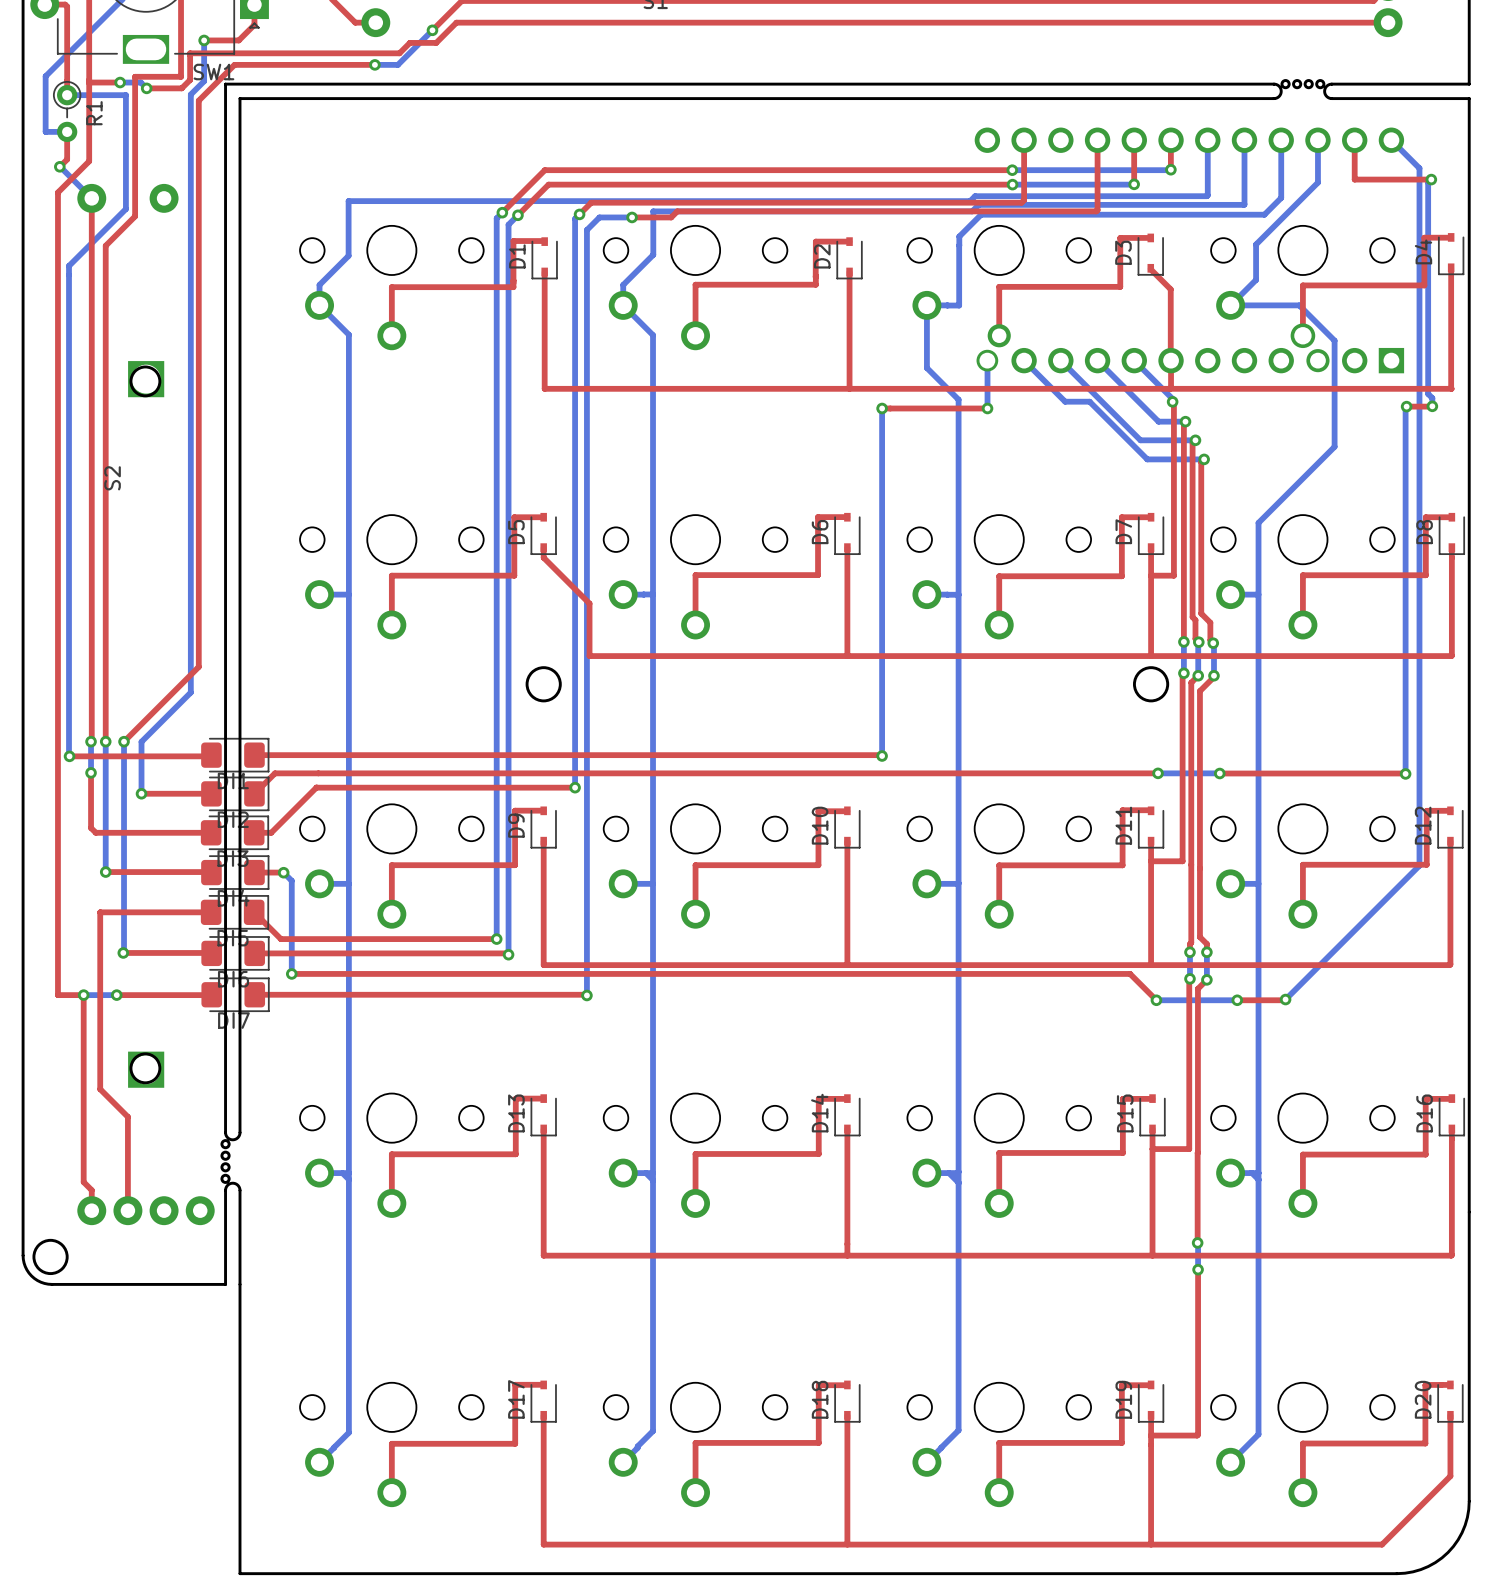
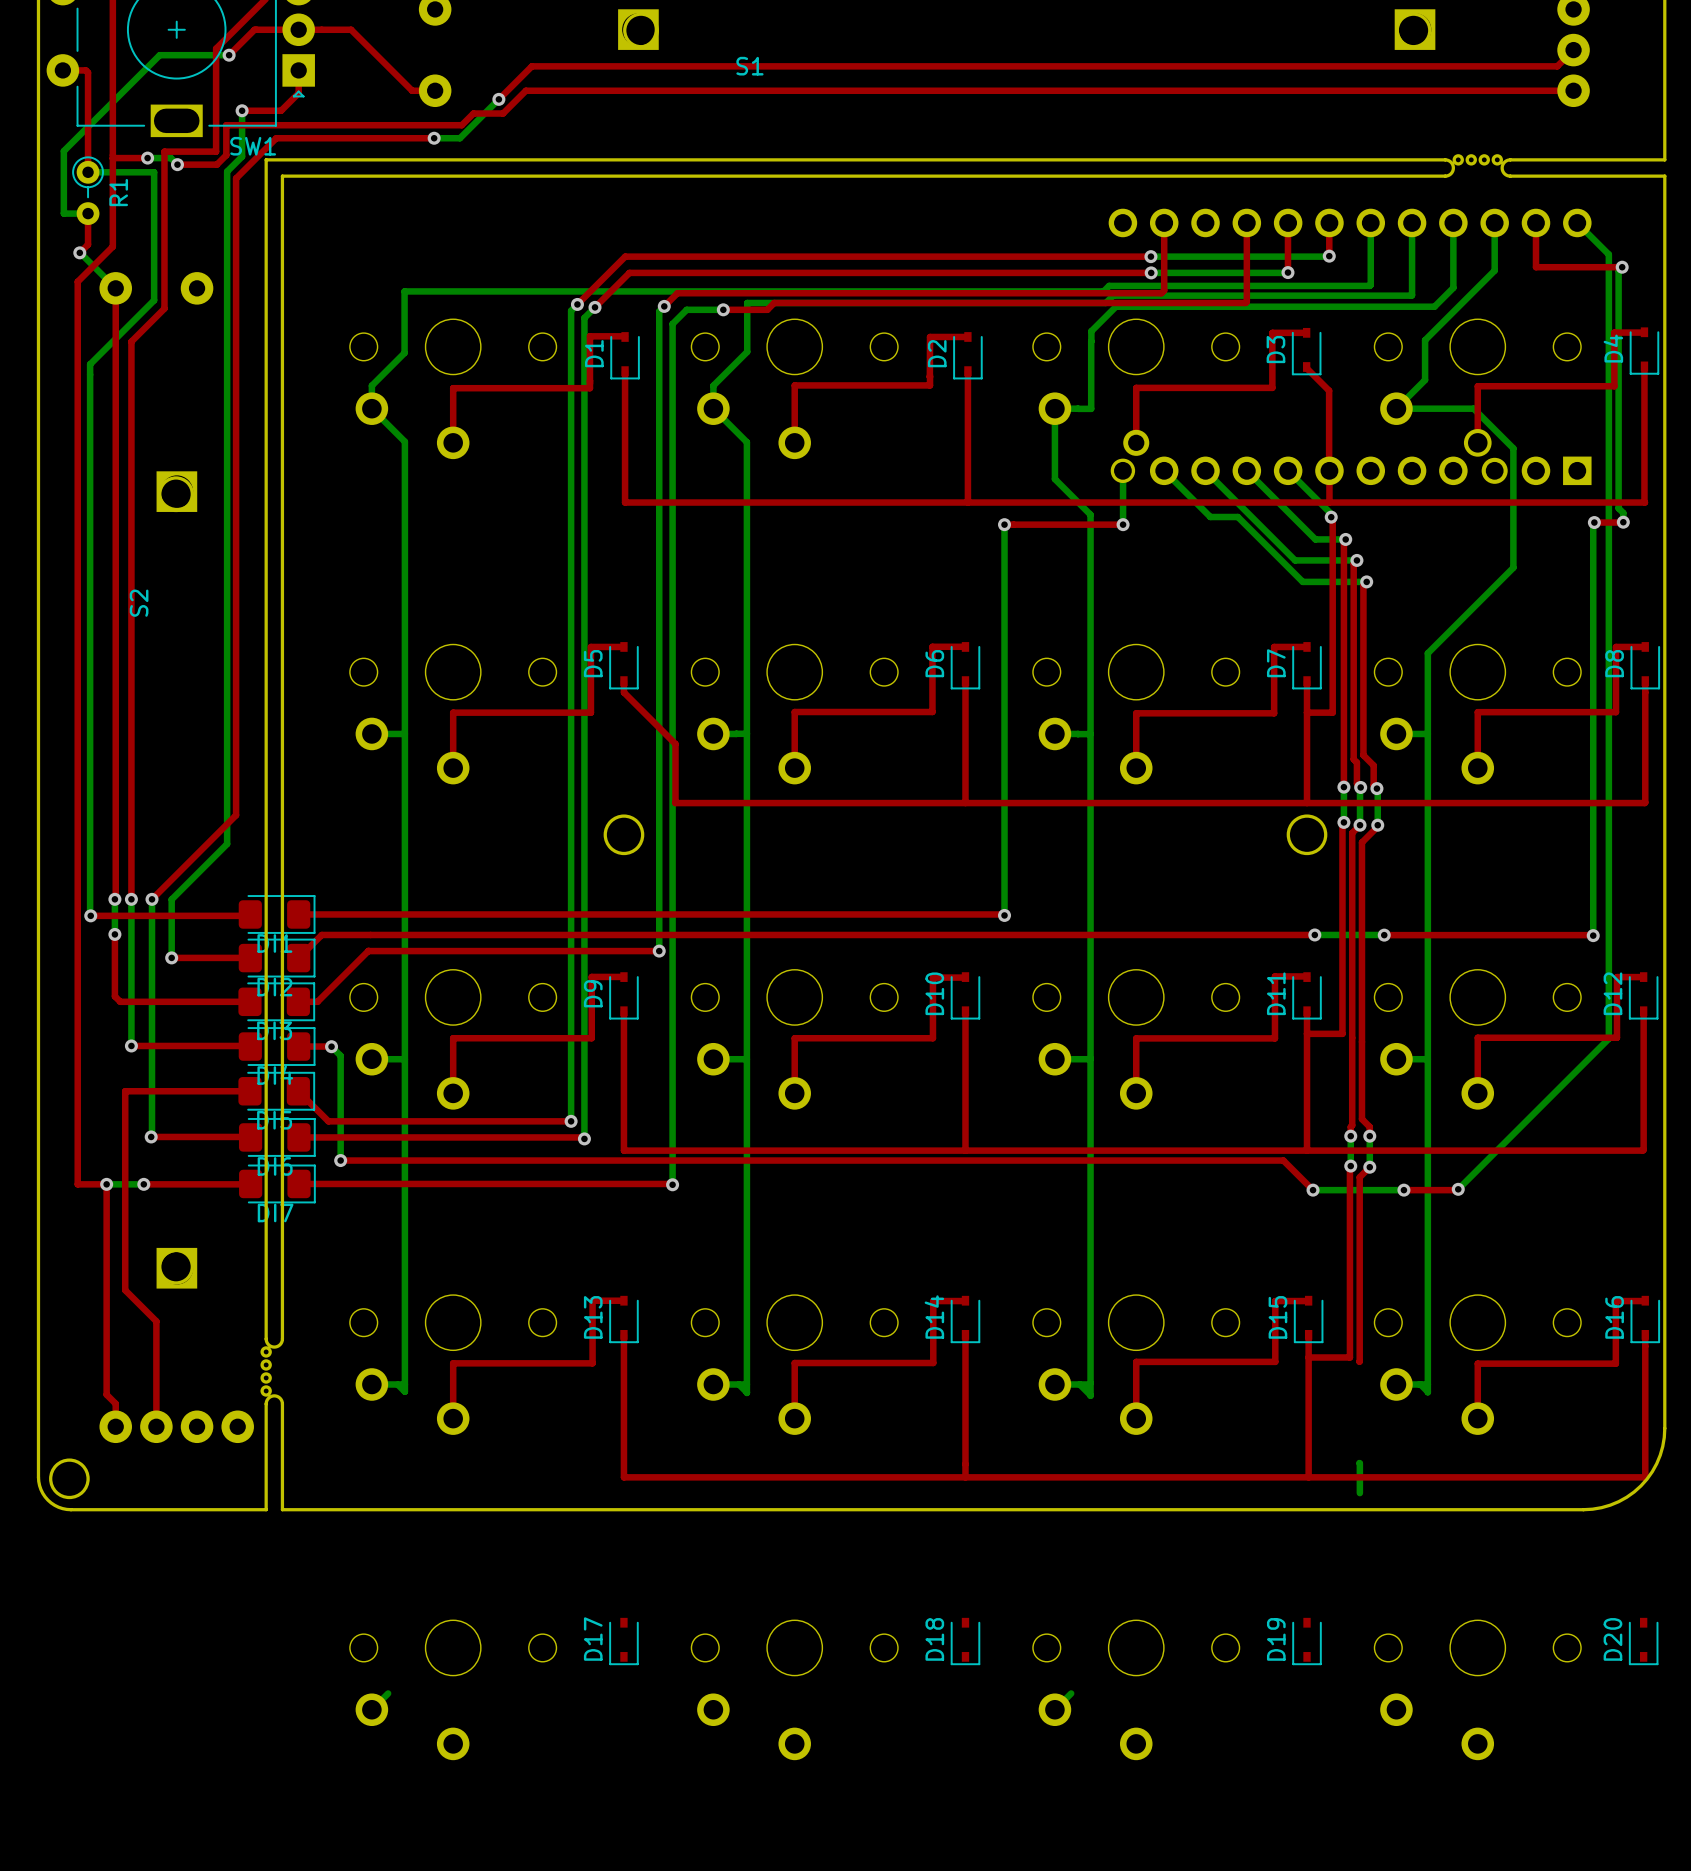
top track: (1197, 1152) (1197, 1242) -> none
bottom track: (348, 1179) (348, 1432) (334, 1447) -> none
bottom track: (653, 1180) (653, 1431) (623, 1462) -> none
bottom track: (1258, 1180) (1258, 1434) (1230, 1462) -> none
bottom track: (958, 1183) (958, 1430) (941, 1447) -> none
board edge: (1469, 1212) (1469, 1501) (1467, 1517) (1458, 1539) (1448, 1552) (1428, 1566) (1405, 1573) (240, 1573) (240, 1284) -> (1664, 1428) (1660, 1455) (1652, 1471) (1640, 1485) (1618, 1501) (1592, 1509) (282, 1509)
via: (1197, 1242) -> none
top track: (1198, 1269) (1198, 1434) (1151, 1435) -> none
via: (1198, 1269) -> none
top track: (543, 1384) (515, 1384) (515, 1443) (391, 1443) (391, 1492) -> none
top track: (1450, 1384) (1425, 1385) (1425, 1443) (1302, 1443) (1302, 1492) -> none
top track: (847, 1385) (818, 1385) (818, 1442) (695, 1442) (695, 1492) -> none
top track: (1151, 1385) (1121, 1385) (1121, 1442) (999, 1442) (999, 1492) -> none
top track: (543, 1415) (543, 1544) (1382, 1544) (1450, 1476) (1450, 1415) -> none
top track: (847, 1415) (847, 1544) -> none
top track: (1151, 1415) (1151, 1544) -> none

